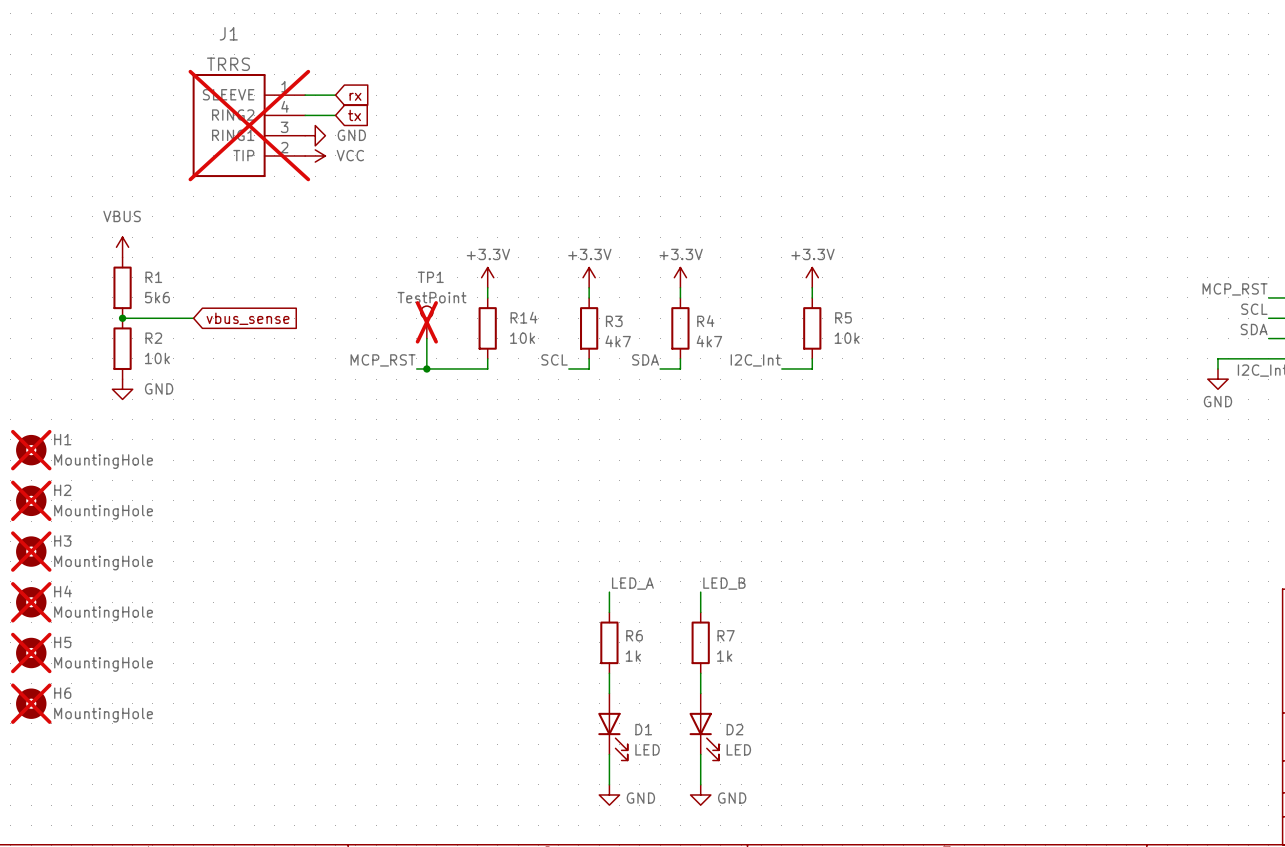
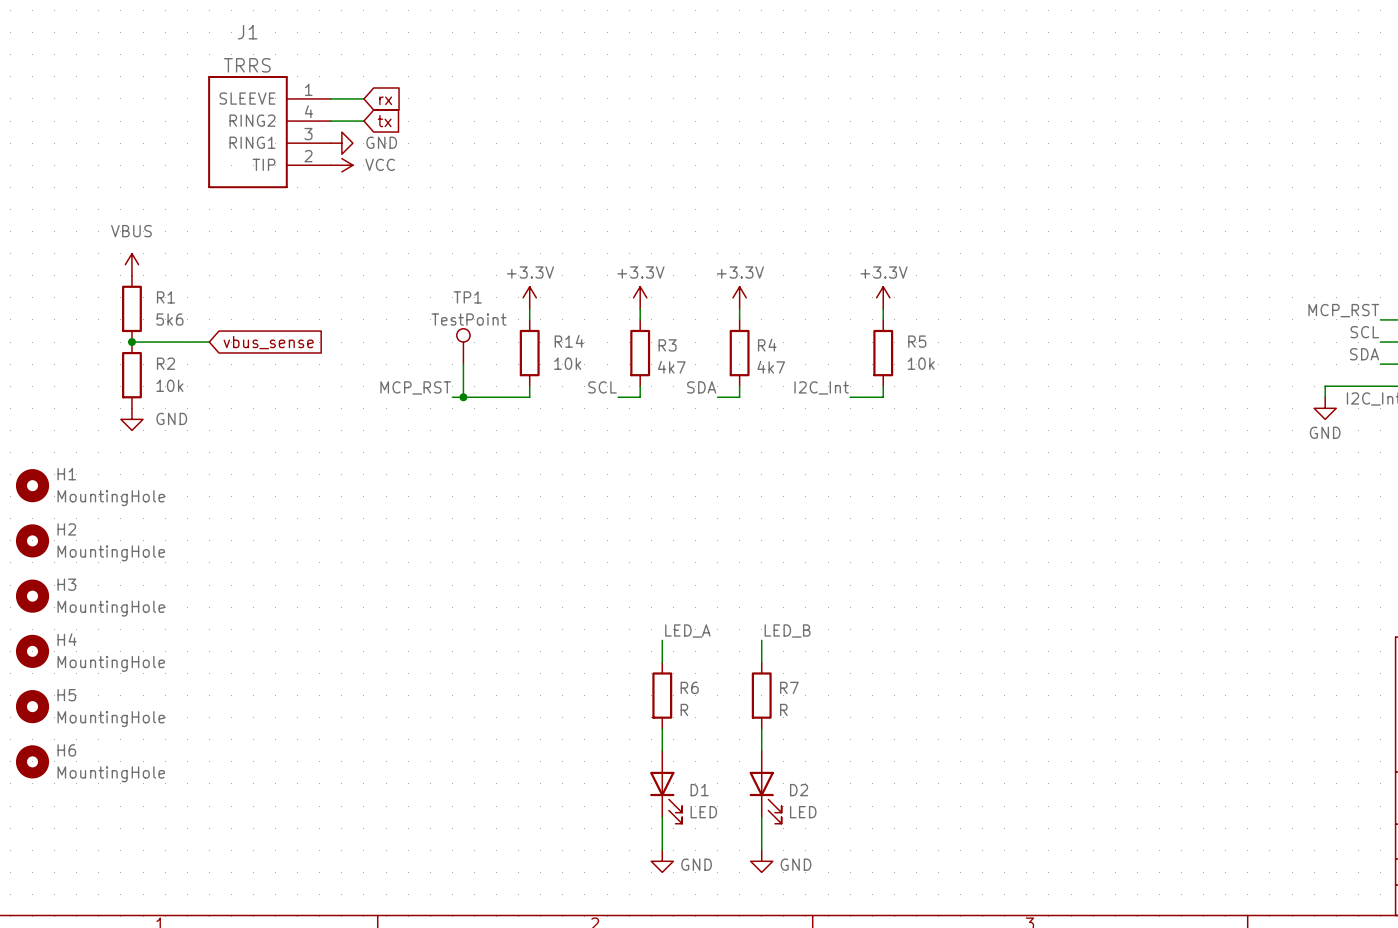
J1 do-not-place cross: (249, 125) -> none
TP1 do-not-place cross: (426, 322) -> none
H1 do-not-place cross: (31, 450) -> none
H2 do-not-place cross: (31, 500) -> none
H3 do-not-place cross: (31, 551) -> none
H4 do-not-place cross: (31, 602) -> none
H5 do-not-place cross: (31, 652) -> none
R6 value: 1k (633, 656) -> R (684, 709)
R7 value: 1k (724, 656) -> R (783, 709)
H6 do-not-place cross: (31, 703) -> none

